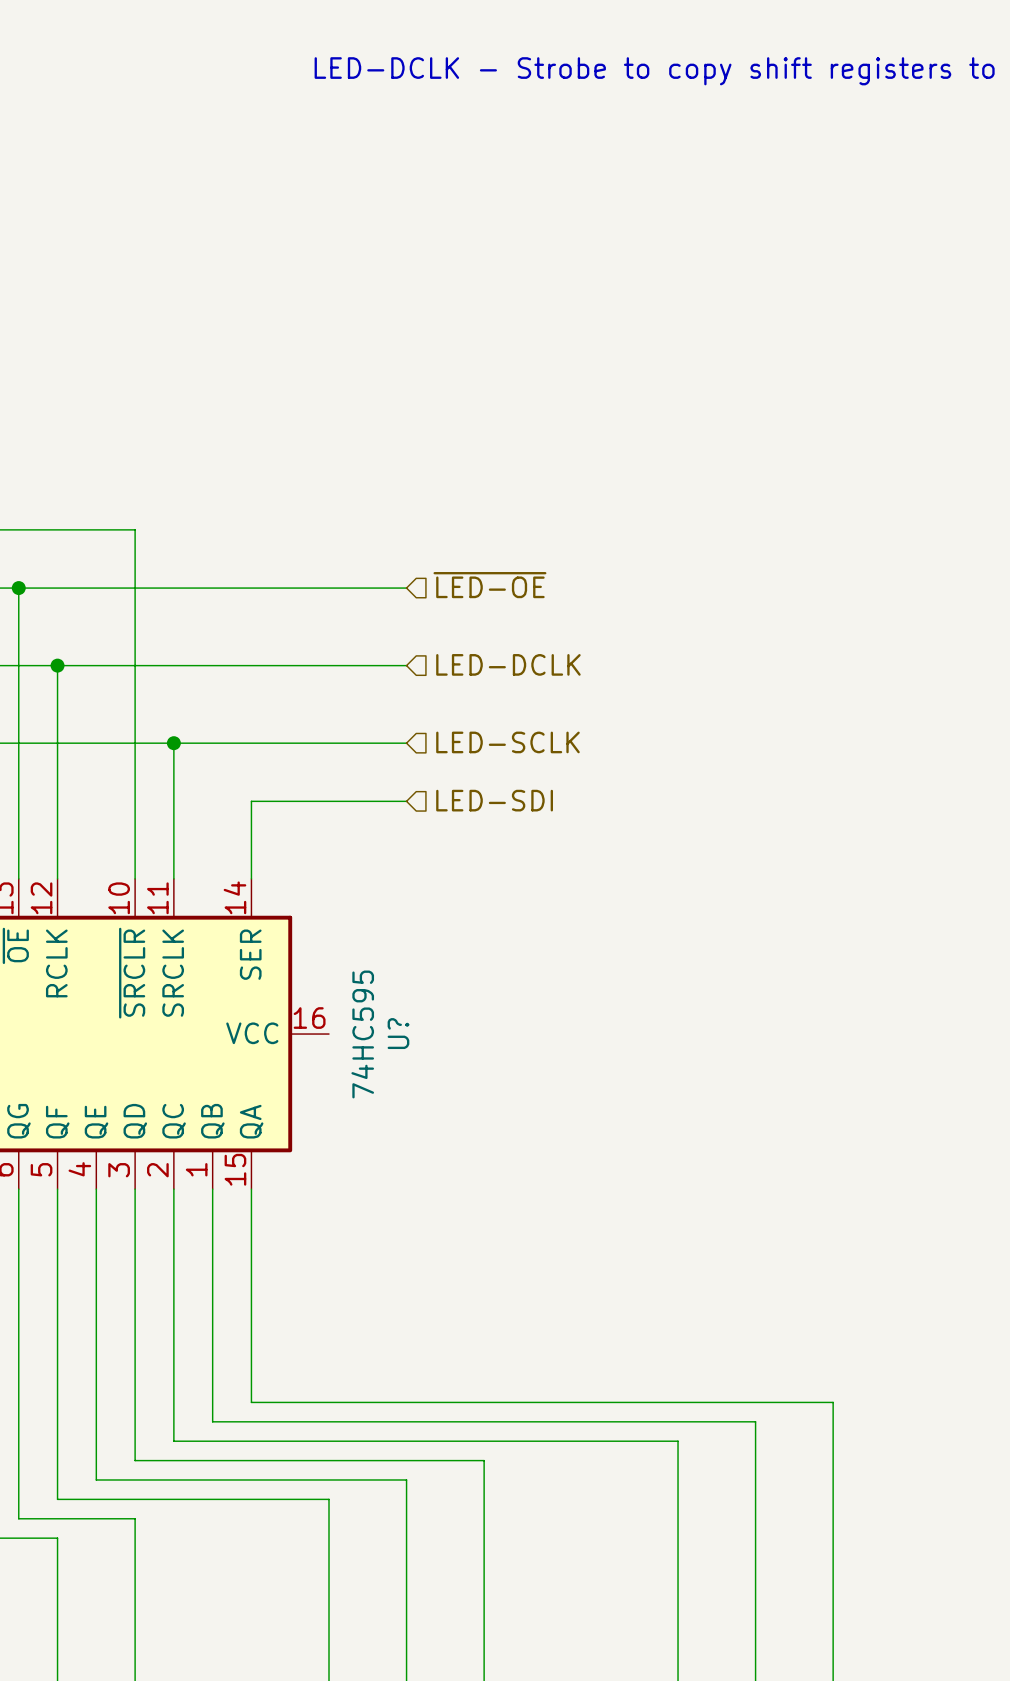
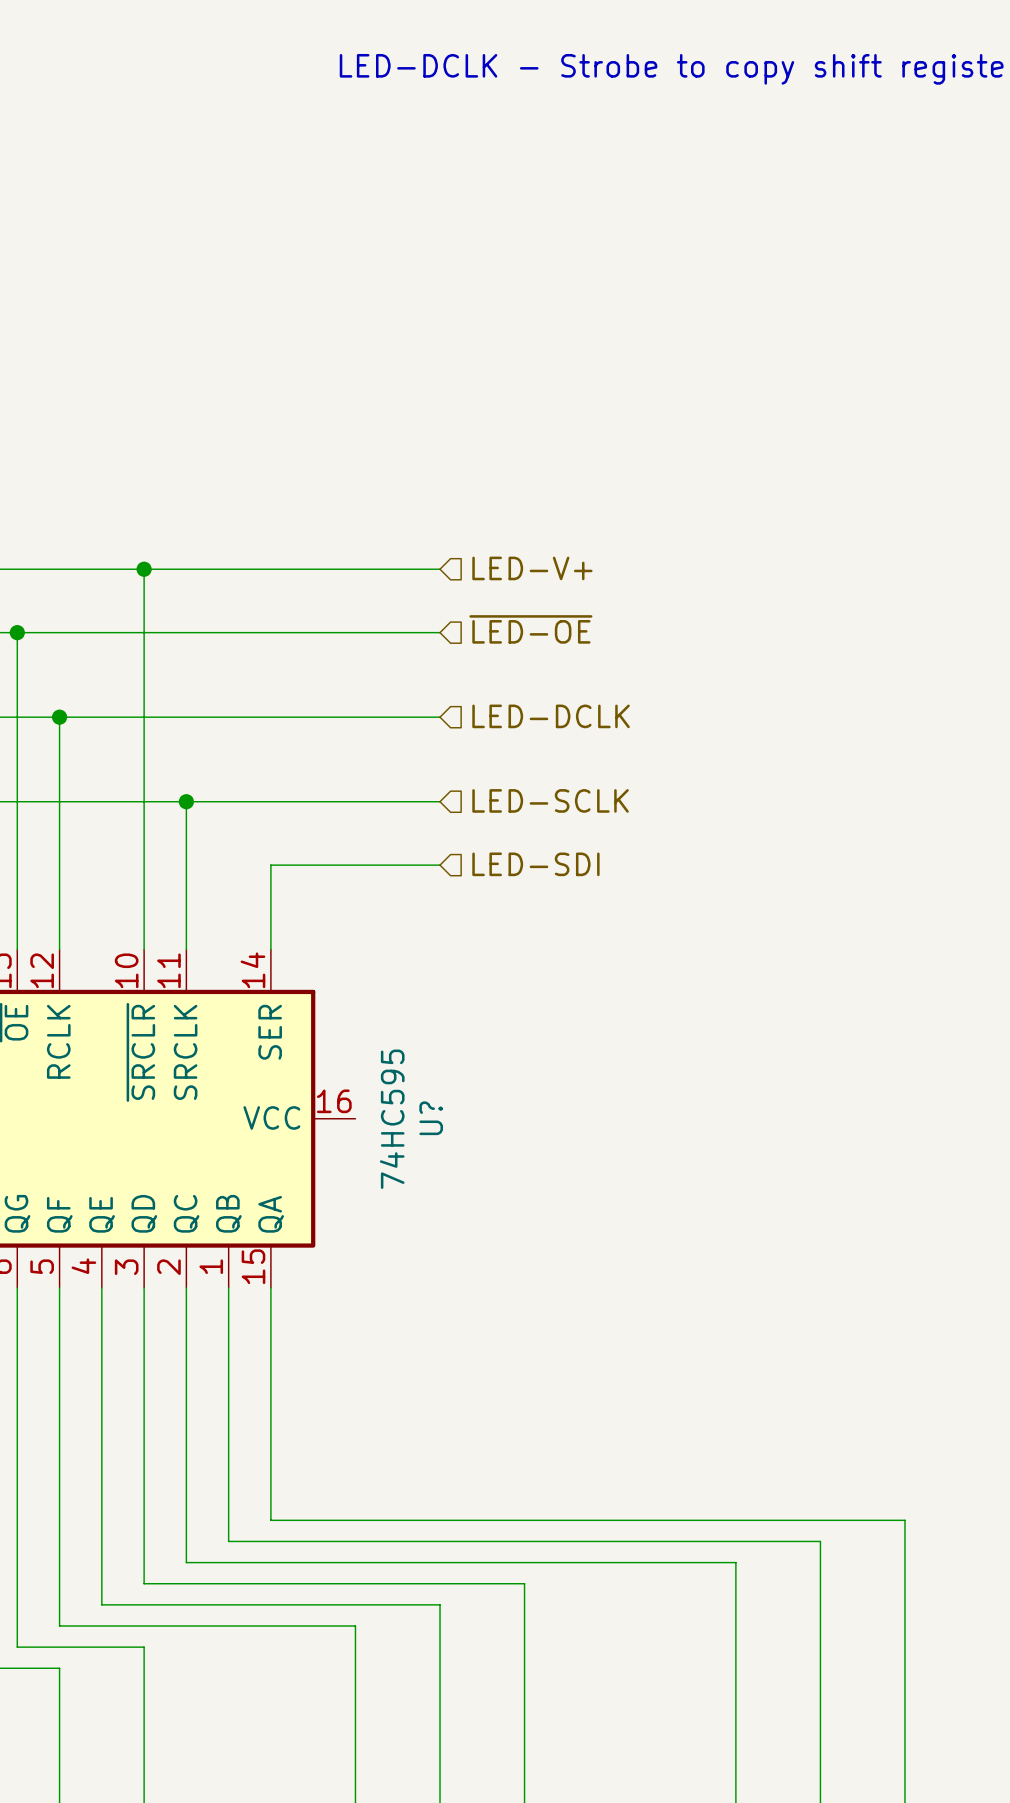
wire: none -> (144, 569) (440, 569)
junction: none -> (144, 569)
hierarchical label: none -> LED-V+ (532, 568)

